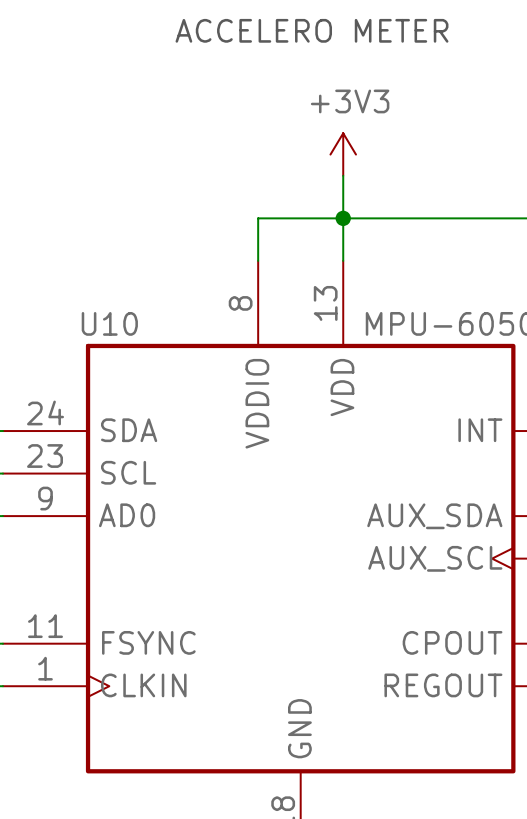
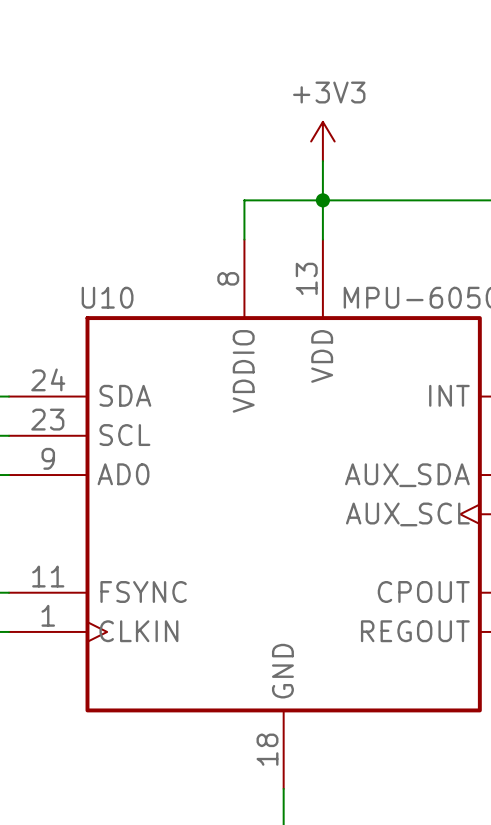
text: ACCELERO METER (312, 30) -> none

